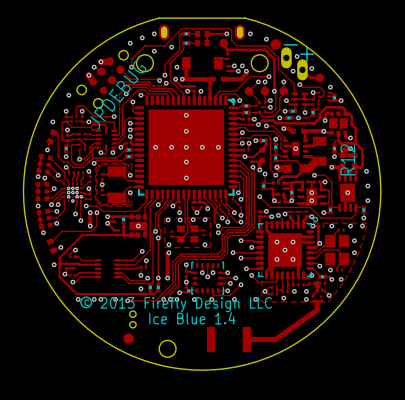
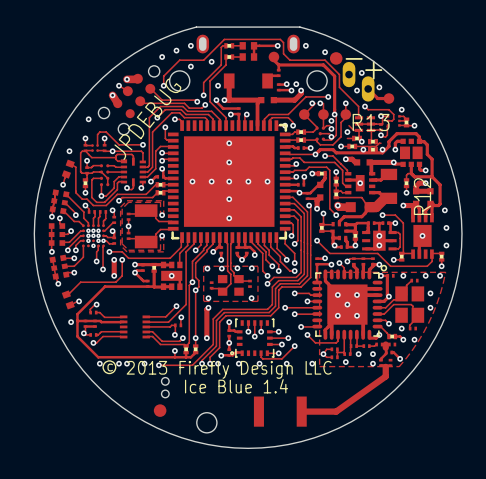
via: none -> (312, 103)
via: (258, 81) -> none
via: none -> (320, 103)
via: (265, 81) -> none
via: none -> (331, 120)
R13 name: none -> R13 (371, 122)
via: (270, 100) -> none
via: (286, 100) -> none
via: none -> (331, 128)
via: none -> (347, 132)
via: (270, 107) -> none
via: none -> (380, 135)
via: none -> (331, 136)
via: (285, 111) -> none
via: (305, 112) -> none
part: (313, 112) -> none
via: none -> (361, 141)
part: none -> (372, 141)
via: (298, 117) -> none
via: none -> (363, 149)
part: none -> (372, 149)
via: none -> (382, 149)

